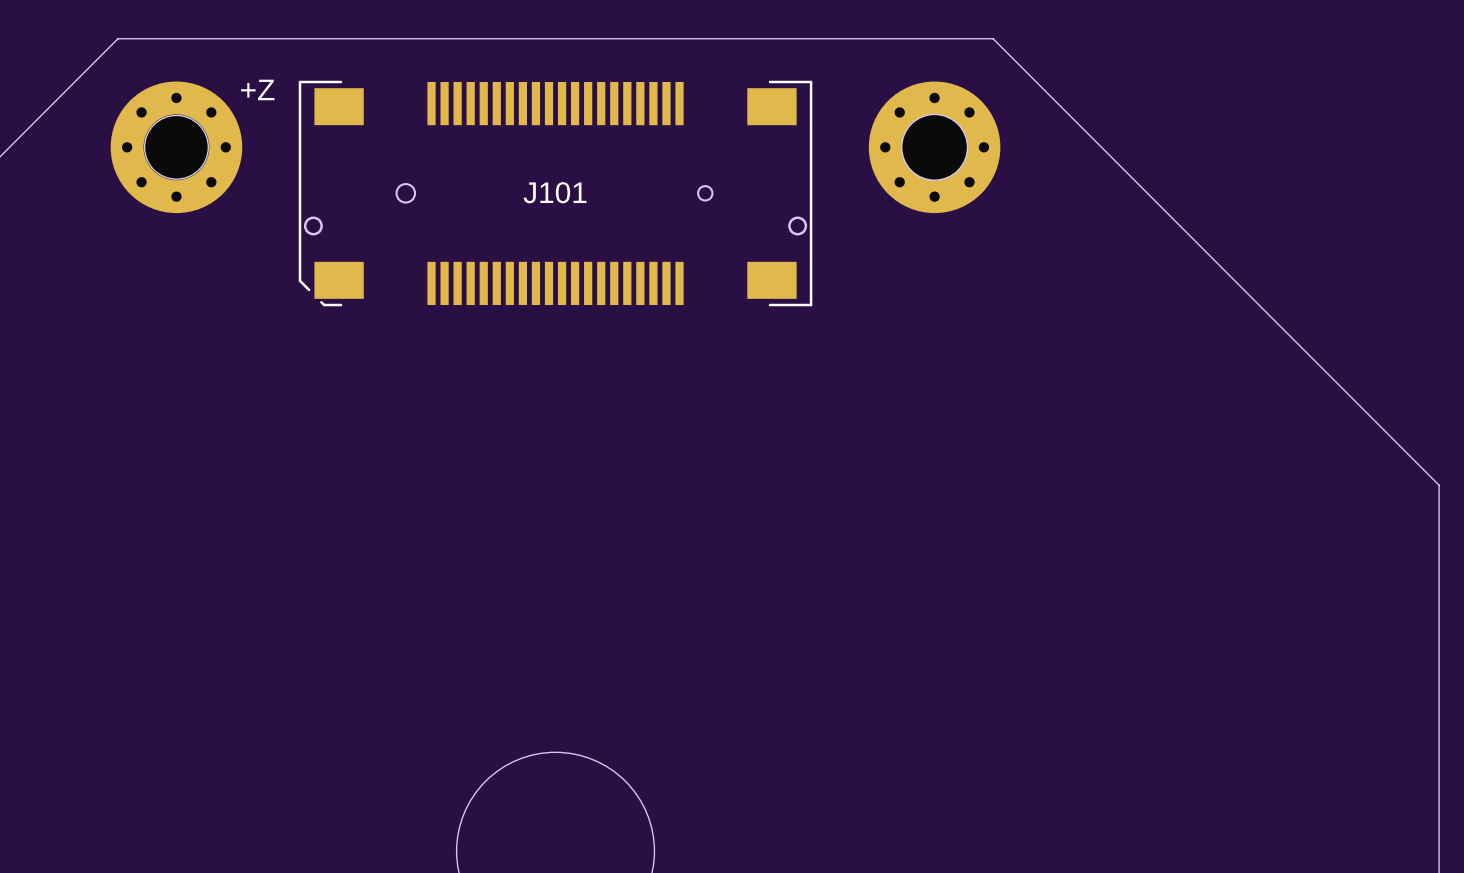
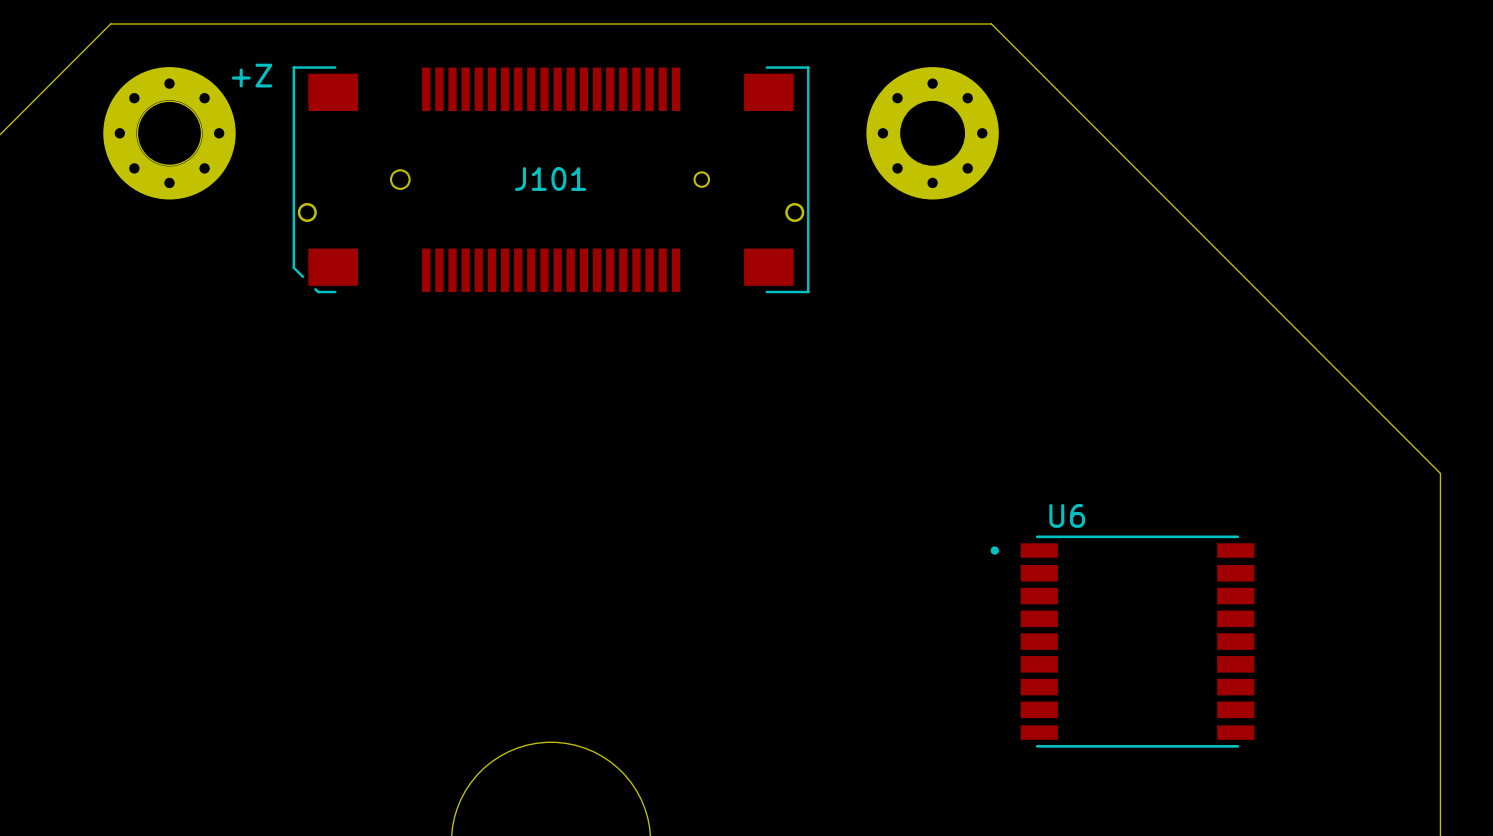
U6: none -> (1122, 641)

